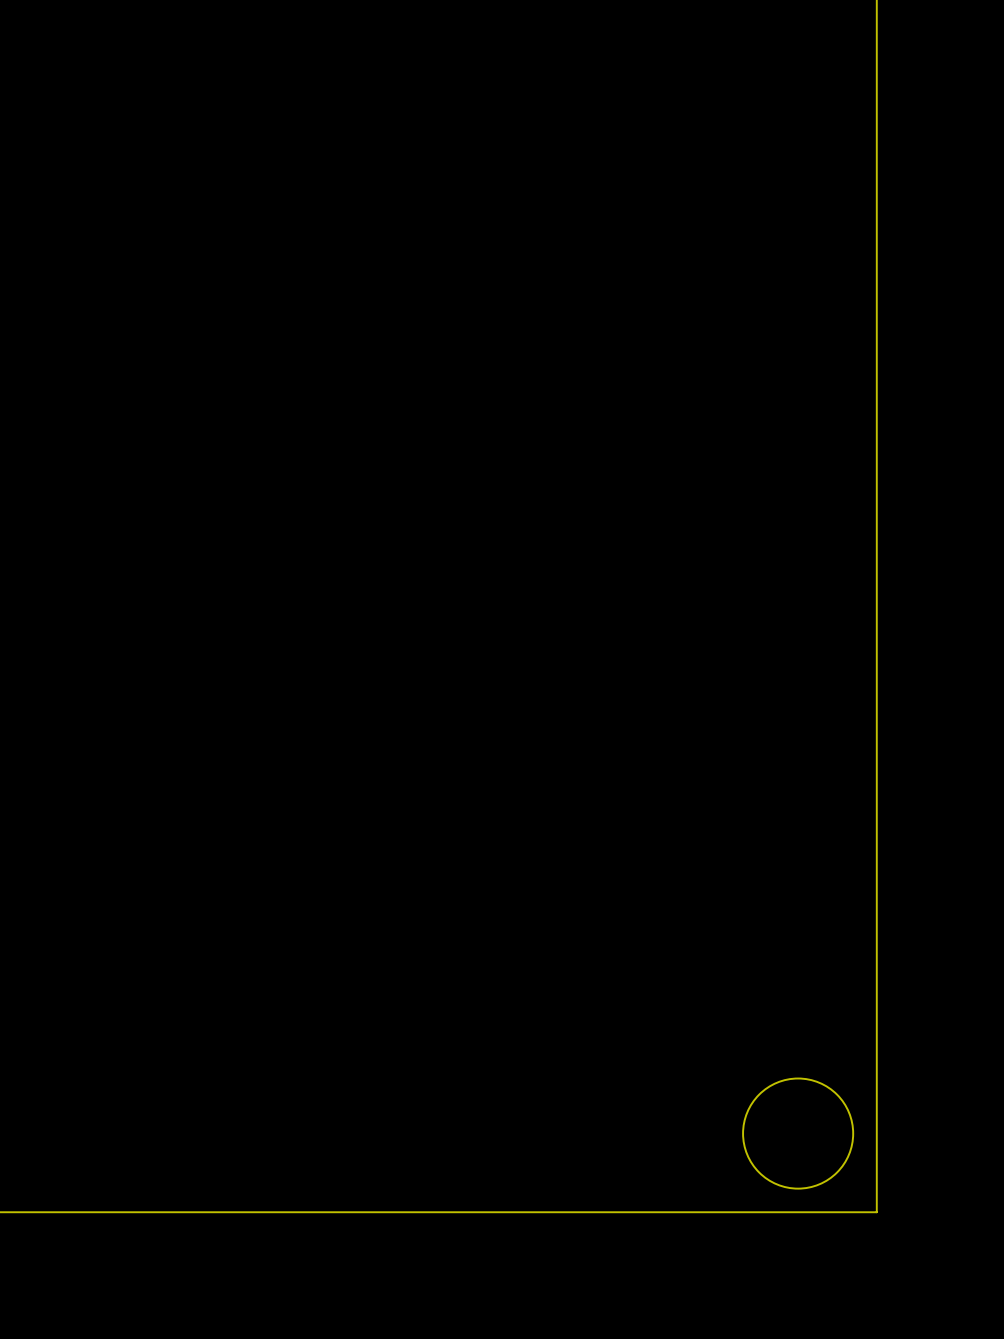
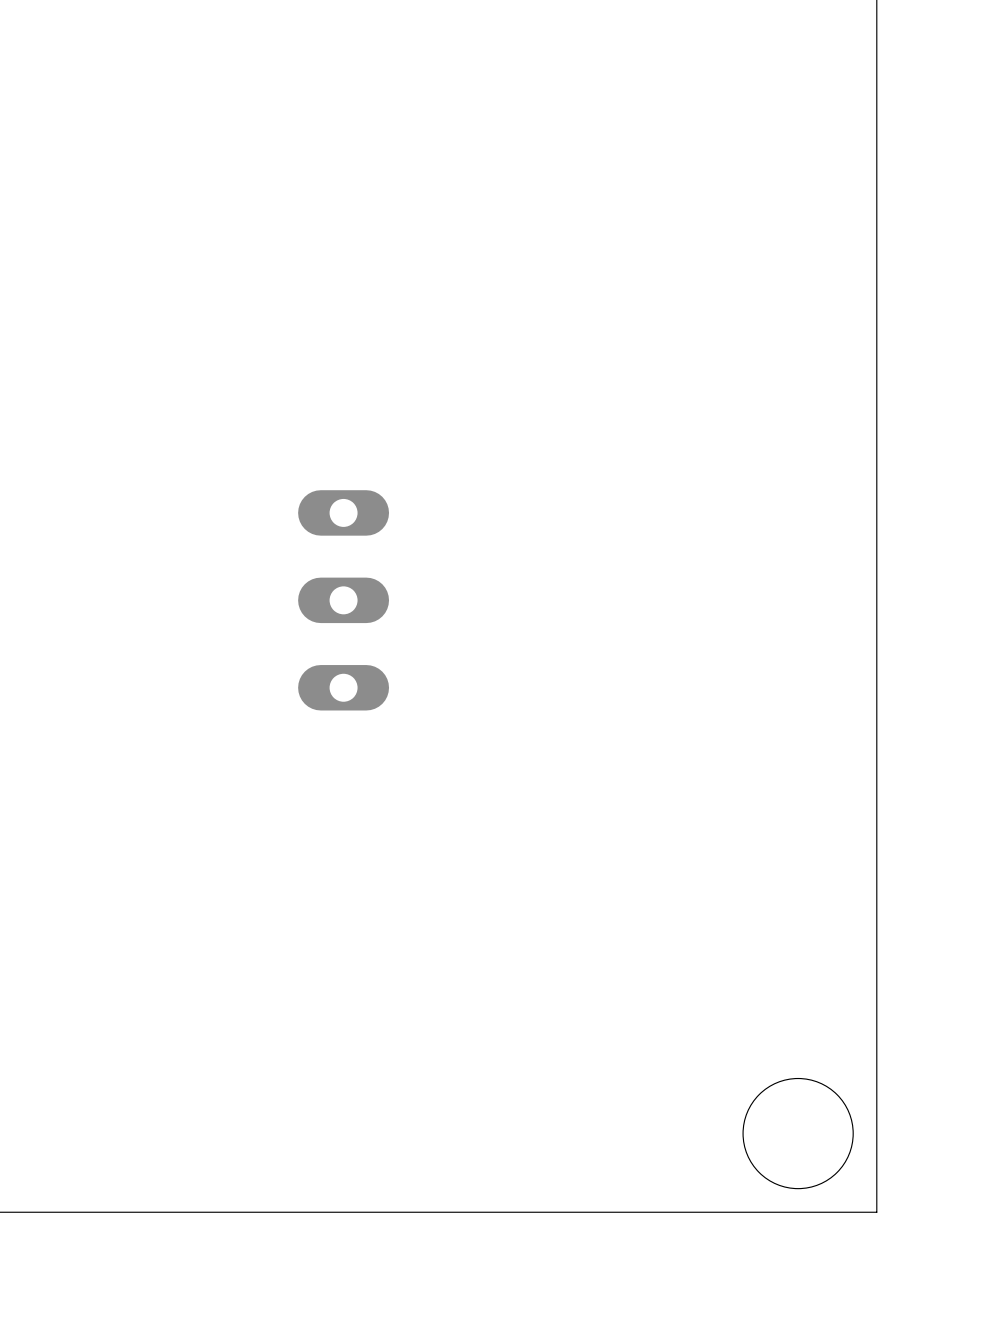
part: none -> (343, 600)

